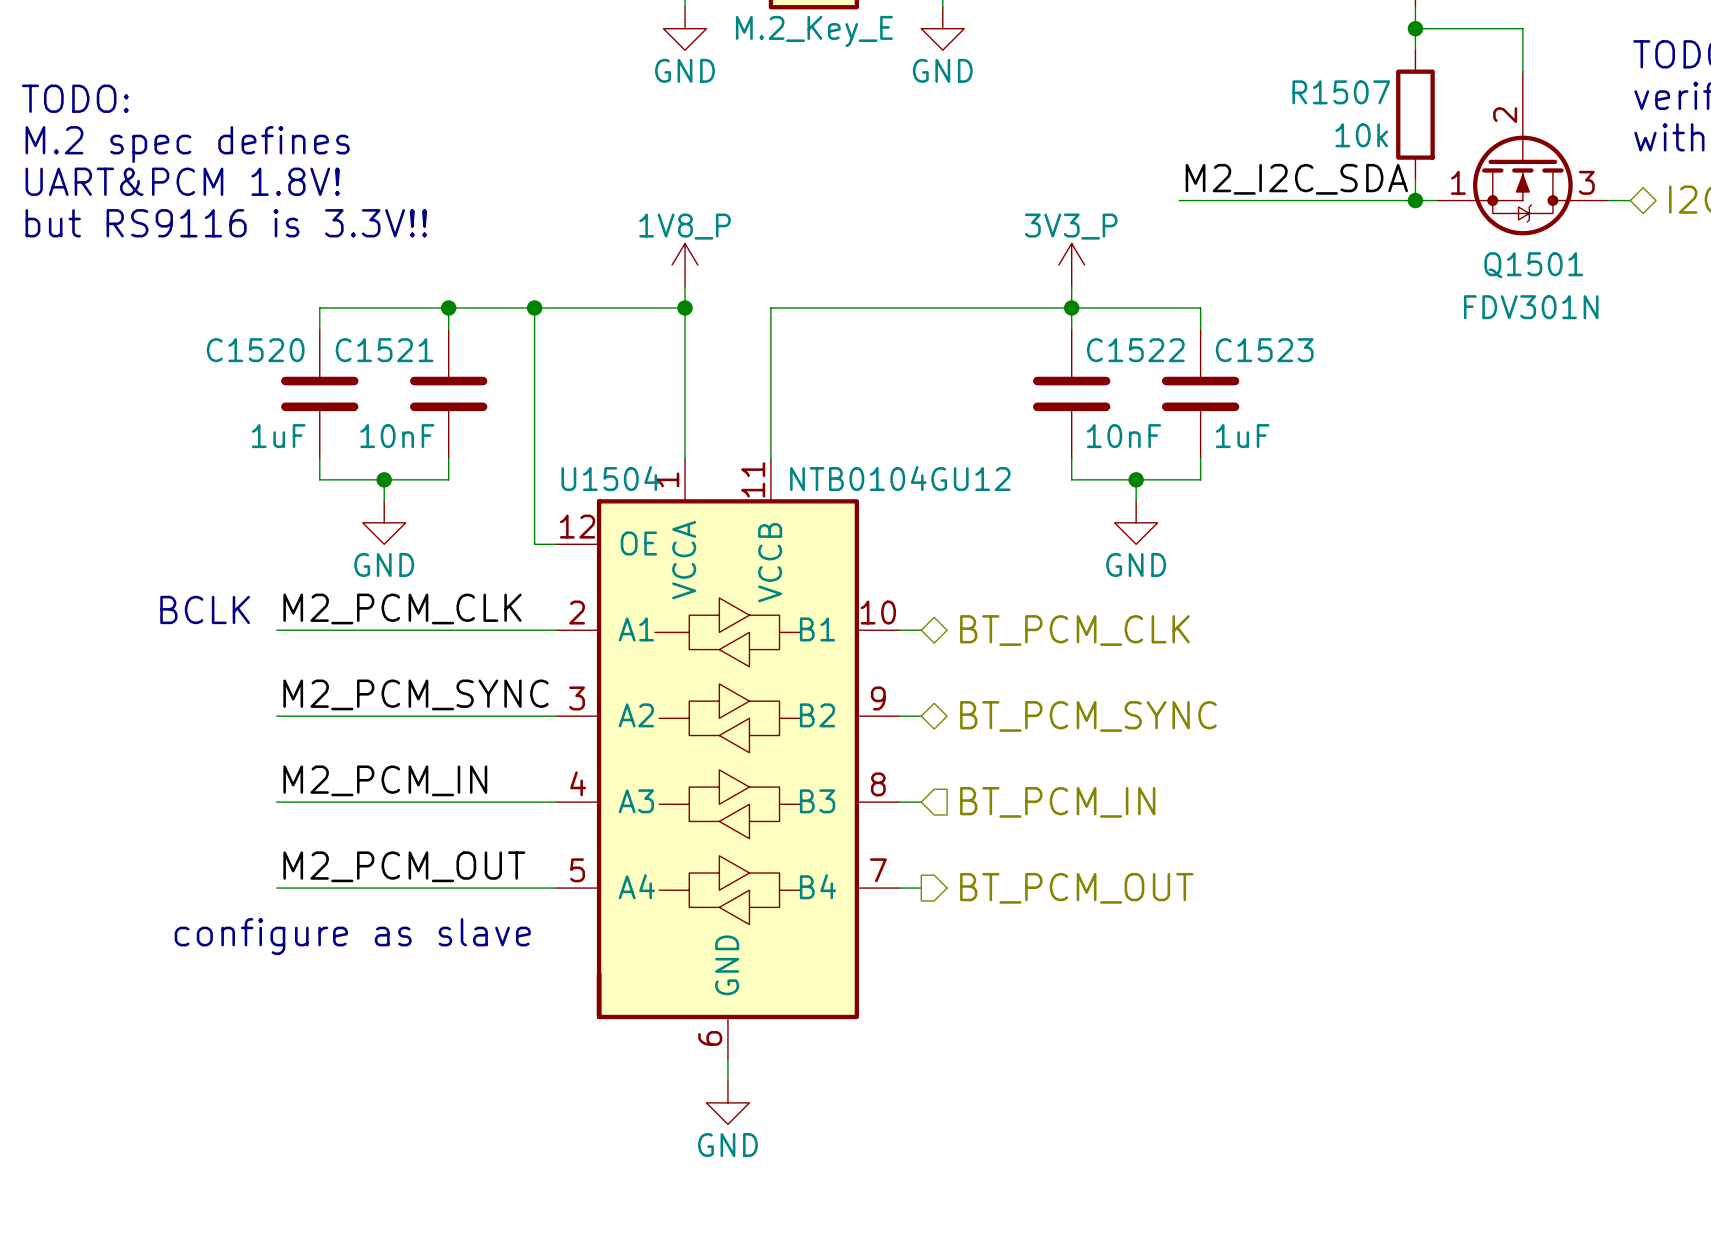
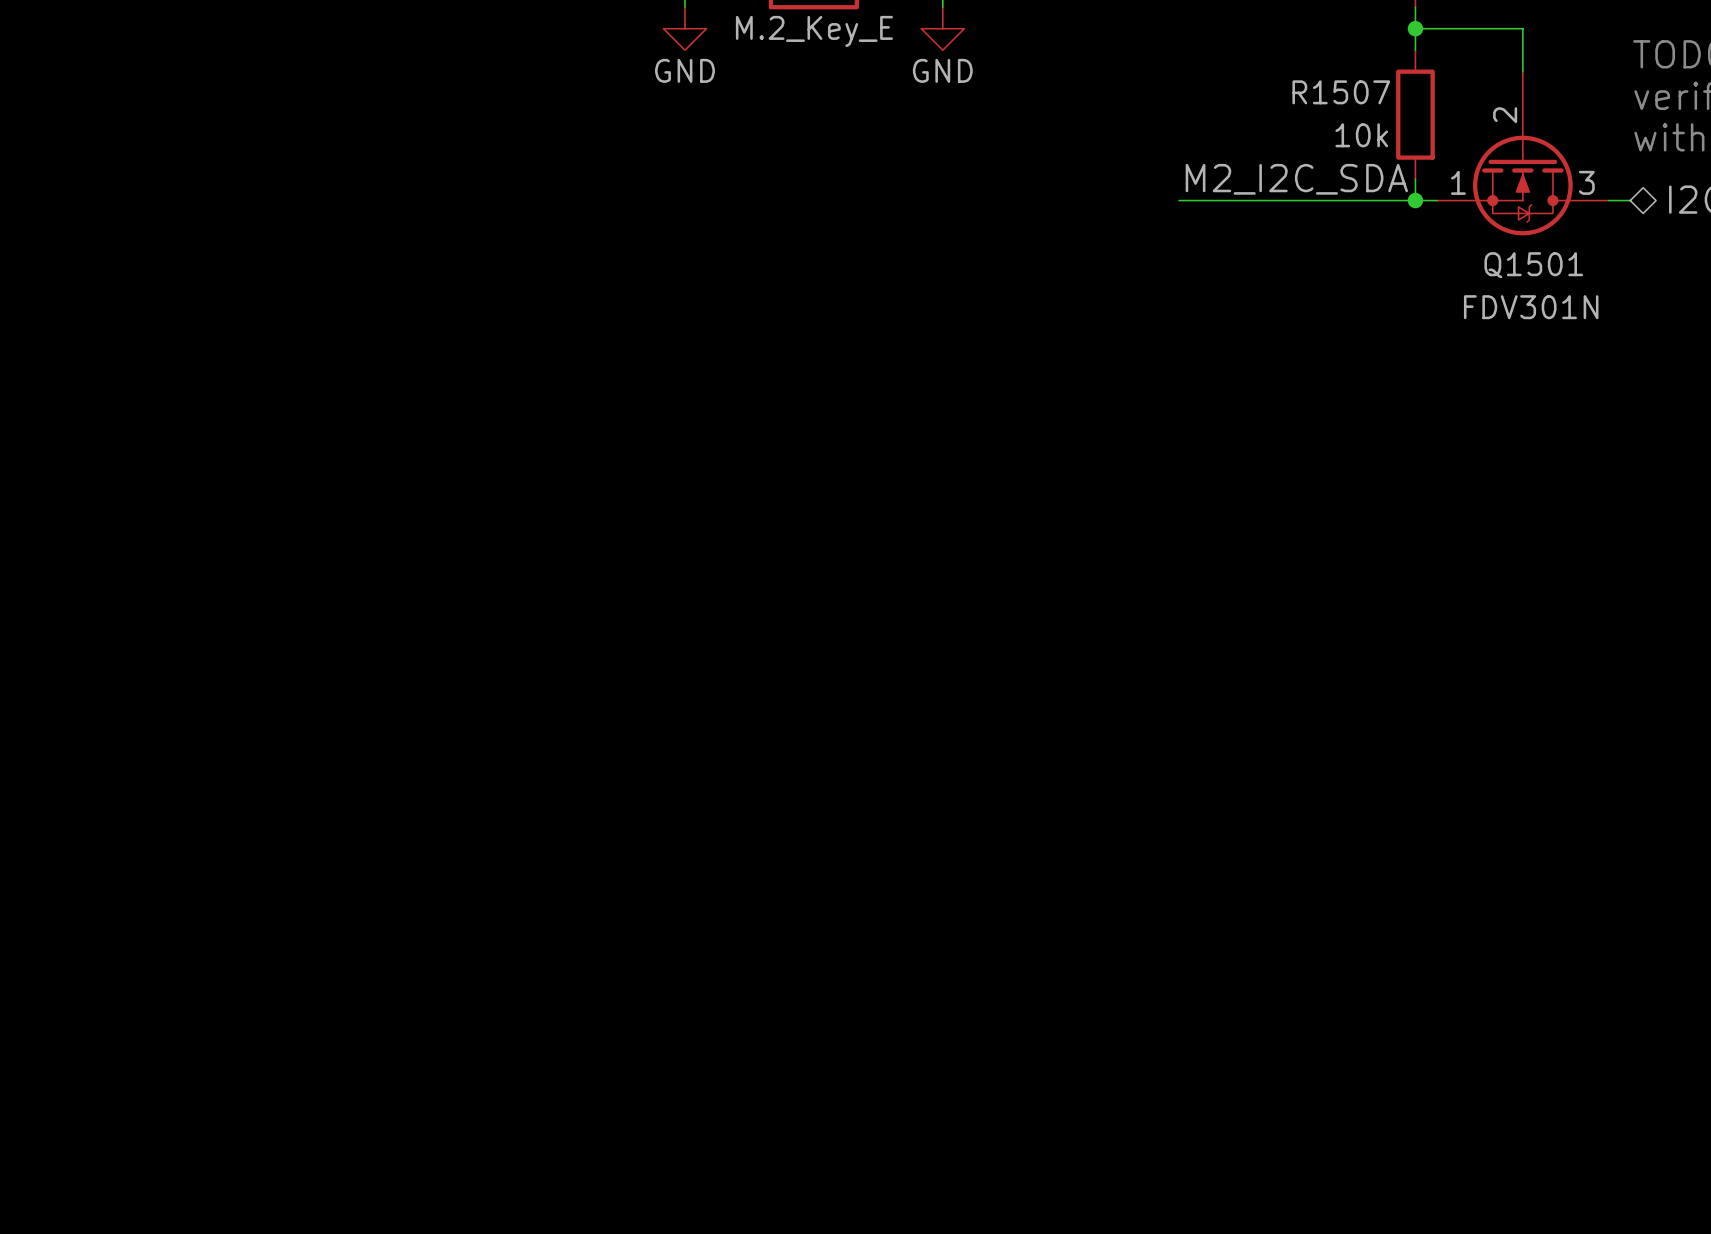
text: TODO: (75, 98) -> none
text: M.2 spec defines (187, 144) -> none
text: UART&PCM 1.8V! (182, 181) -> none
text: but RS9116 is 3.3V!! (226, 223) -> none
power symbol: 1V8_P (684, 265) -> none
power symbol: 3V3_P (1071, 265) -> none
wire: (684, 286) (684, 458) -> none
wire: (1071, 286) (1071, 329) -> none
wire: (448, 307) (448, 329) -> none
junction: (448, 307) -> none
wire: (534, 307) (534, 544) (556, 544) -> none
junction: (534, 307) -> none
wire: (684, 307) (319, 307) (319, 329) -> none
junction: (684, 307) -> none
junction: (1071, 307) -> none
wire: (1200, 329) (1200, 307) (770, 307) (770, 458) -> none
C1520: 1uF (319, 393) -> none
C1521: 10nF (448, 393) -> none
C1522: 10nF (1071, 393) -> none
C1523: 1uF (1200, 393) -> none
wire: (319, 458) (319, 479) (448, 479) (448, 458) -> none
wire: (1071, 458) (1071, 479) (1200, 479) (1200, 458) -> none
wire: (384, 479) (384, 501) -> none
junction: (384, 479) -> none
wire: (1136, 479) (1136, 501) -> none
junction: (1136, 479) -> none
power symbol: GND (384, 522) -> none
power symbol: GND (1136, 522) -> none
label: M2_PCM_CLK (402, 608) -> none
text: BCLK (205, 609) -> none
wire: (276, 630) (556, 630) -> none
wire: (899, 630) (921, 630) -> none
hierarchical label: BT_PCM_CLK (1074, 630) -> none
label: M2_PCM_SYNC (415, 694) -> none
wire: (276, 716) (556, 716) -> none
wire: (899, 716) (921, 716) -> none
hierarchical label: BT_PCM_SYNC (1088, 716) -> none
U1504: NTB0104GU12 (727, 759) -> none
label: M2_PCM_IN (385, 780) -> none
wire: (276, 802) (556, 802) -> none
wire: (899, 802) (921, 802) -> none
hierarchical label: BT_PCM_IN (1057, 802) -> none
label: M2_PCM_OUT (404, 866) -> none
wire: (276, 888) (556, 888) -> none
wire: (899, 888) (921, 888) -> none
hierarchical label: BT_PCM_OUT (1076, 888) -> none
text: configure as slave (352, 936) -> none
wire: (727, 1059) (727, 1081) -> none
power symbol: GND (727, 1102) -> none

